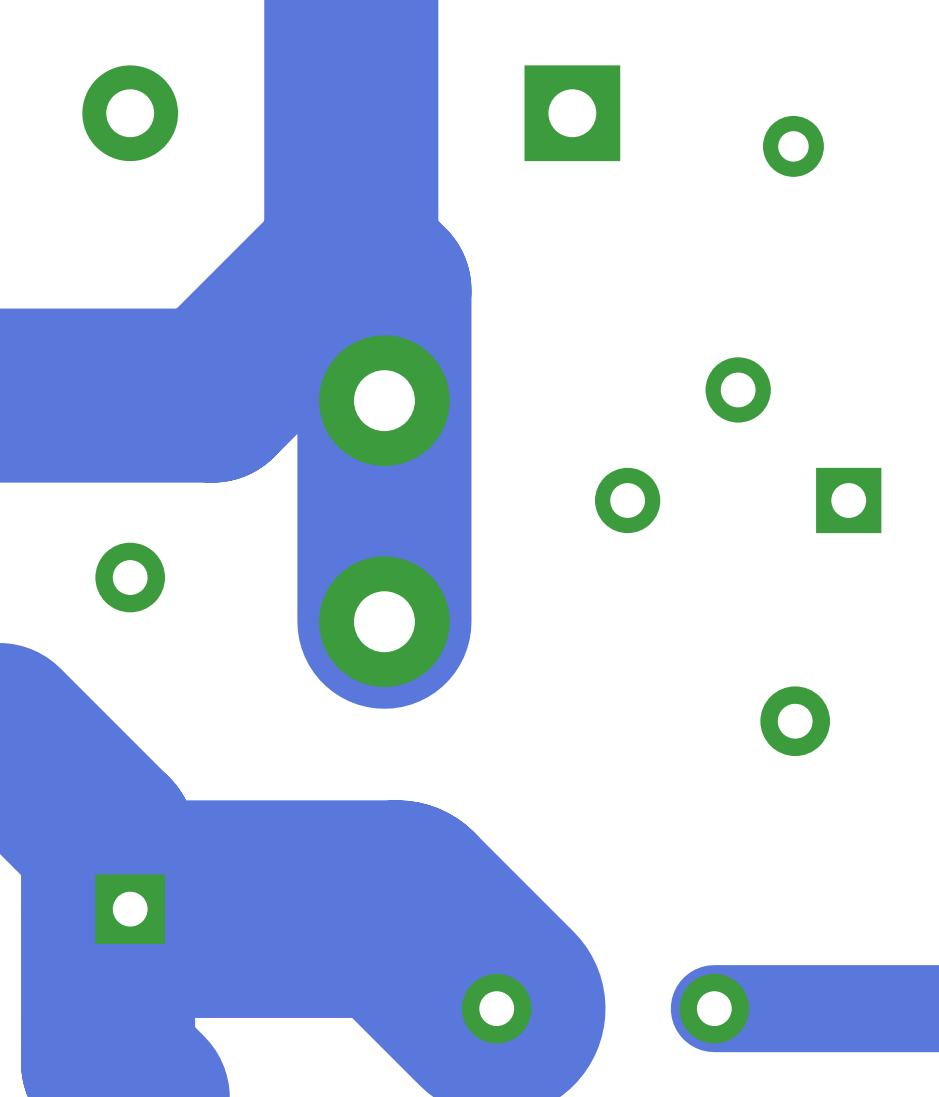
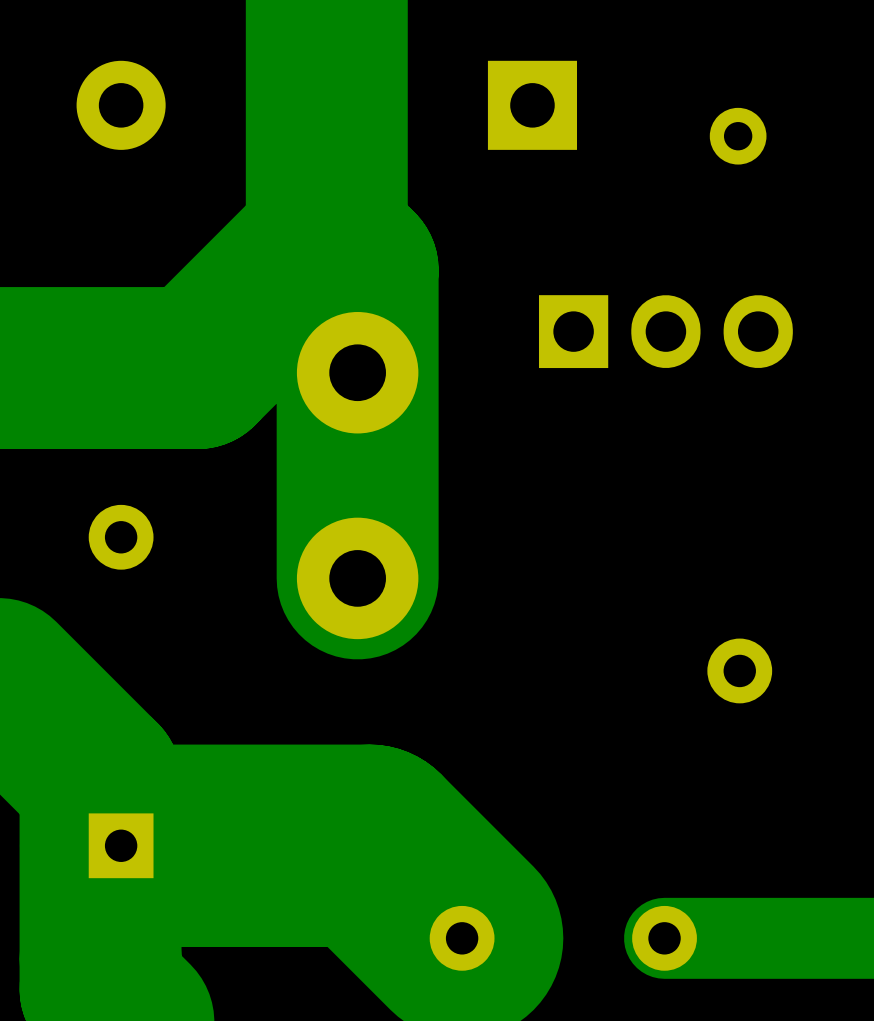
part: none -> (665, 331)
part: (738, 445) -> none

